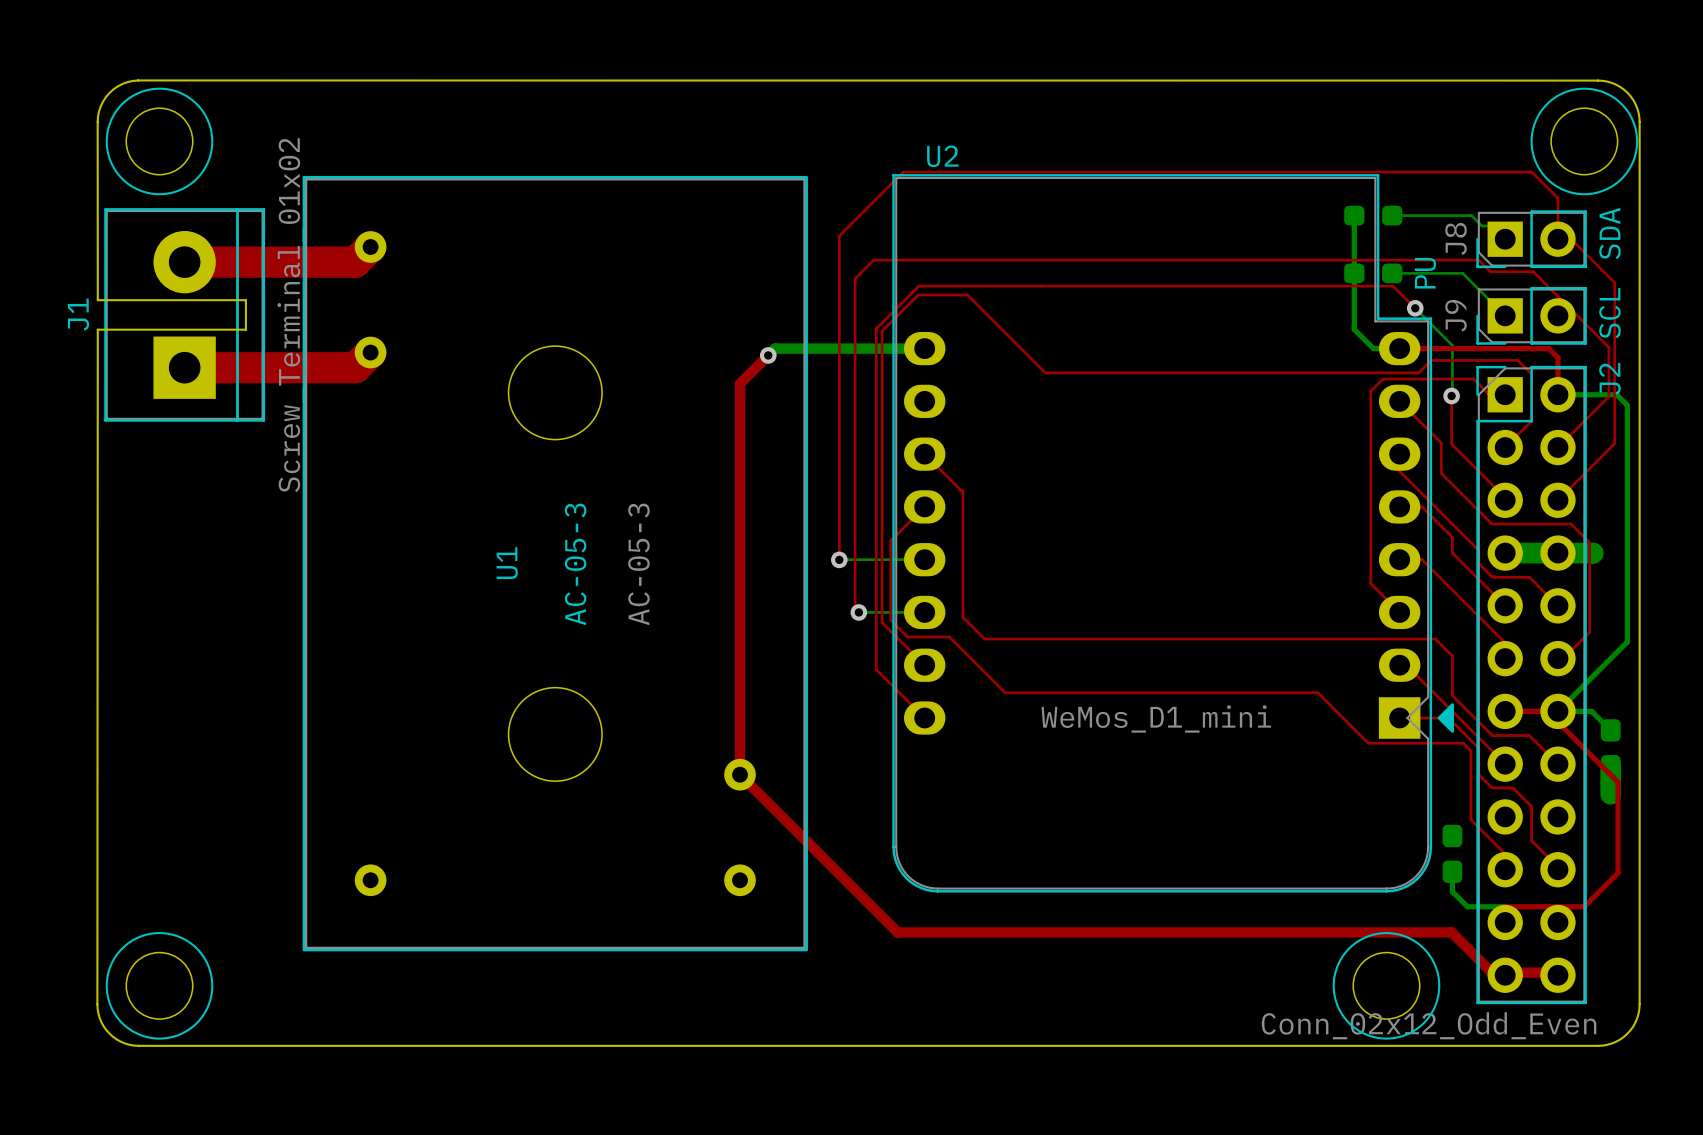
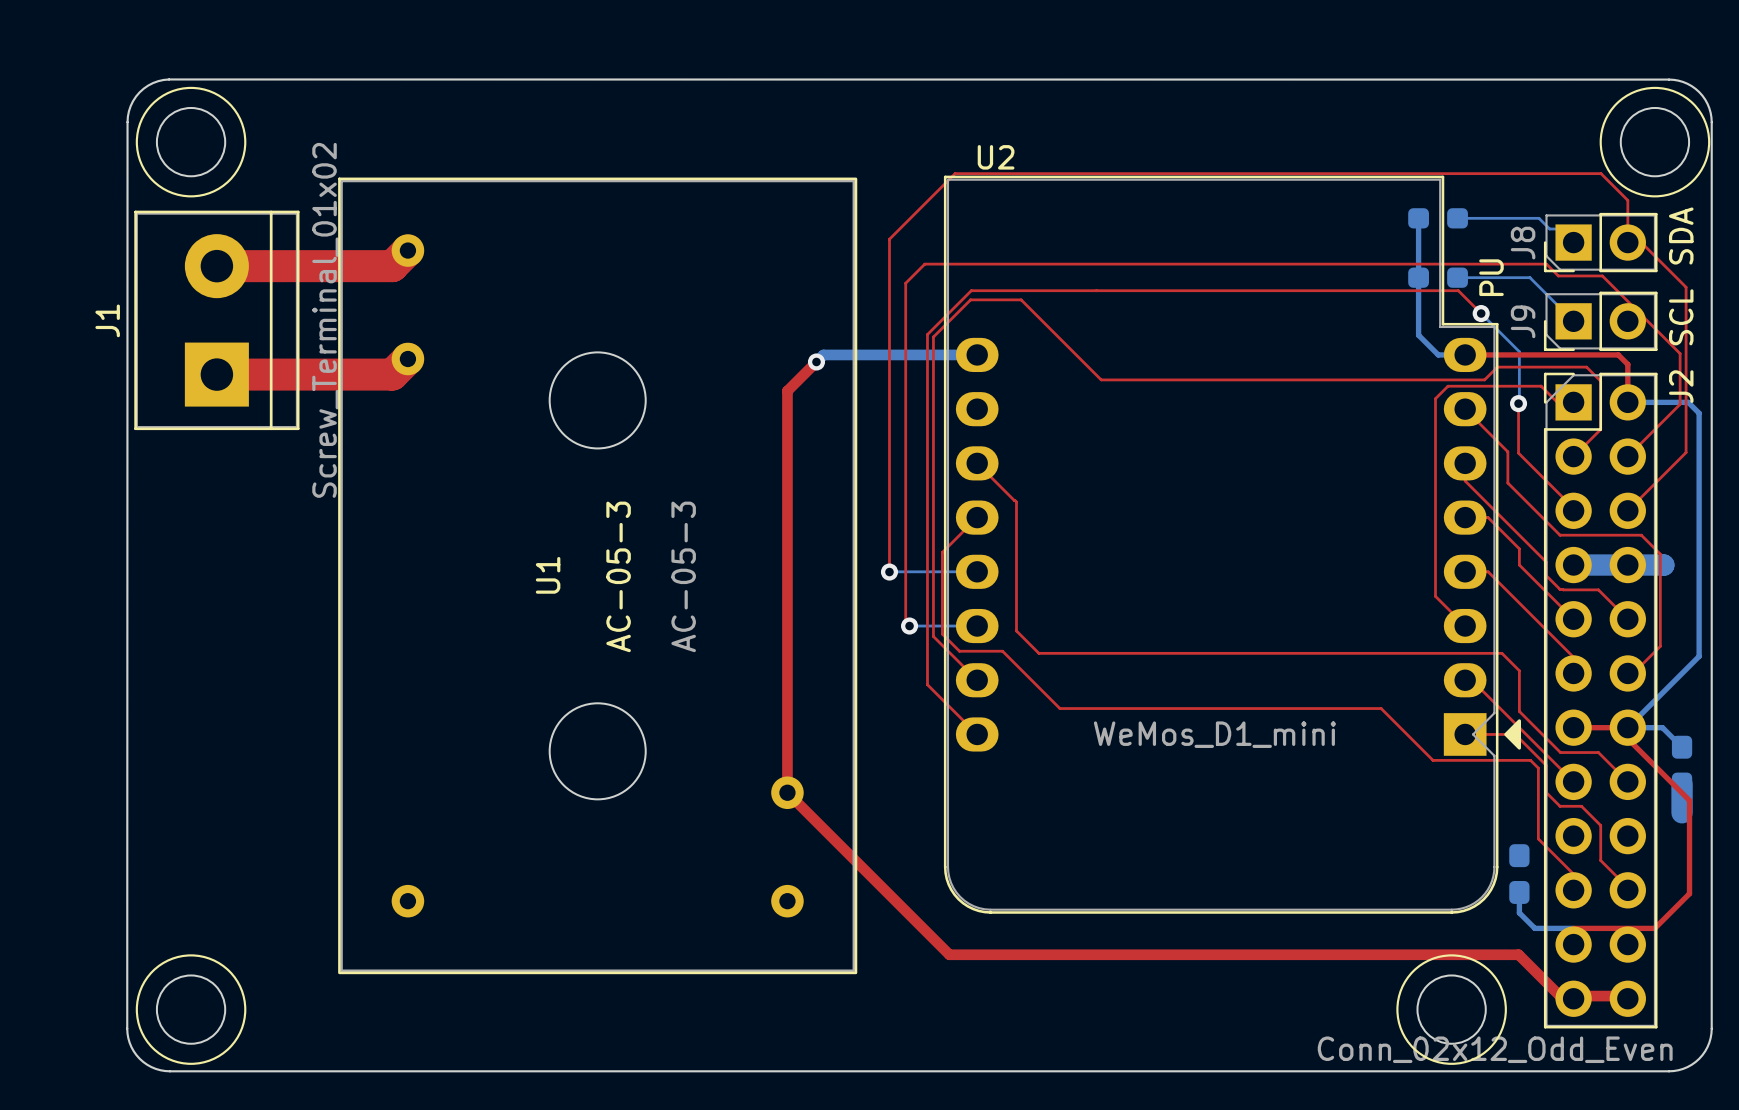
board edge: (97, 122) (97, 300) (245, 300) (245, 329) (97, 329) (97, 1004) -> (127, 122) (127, 1028)

